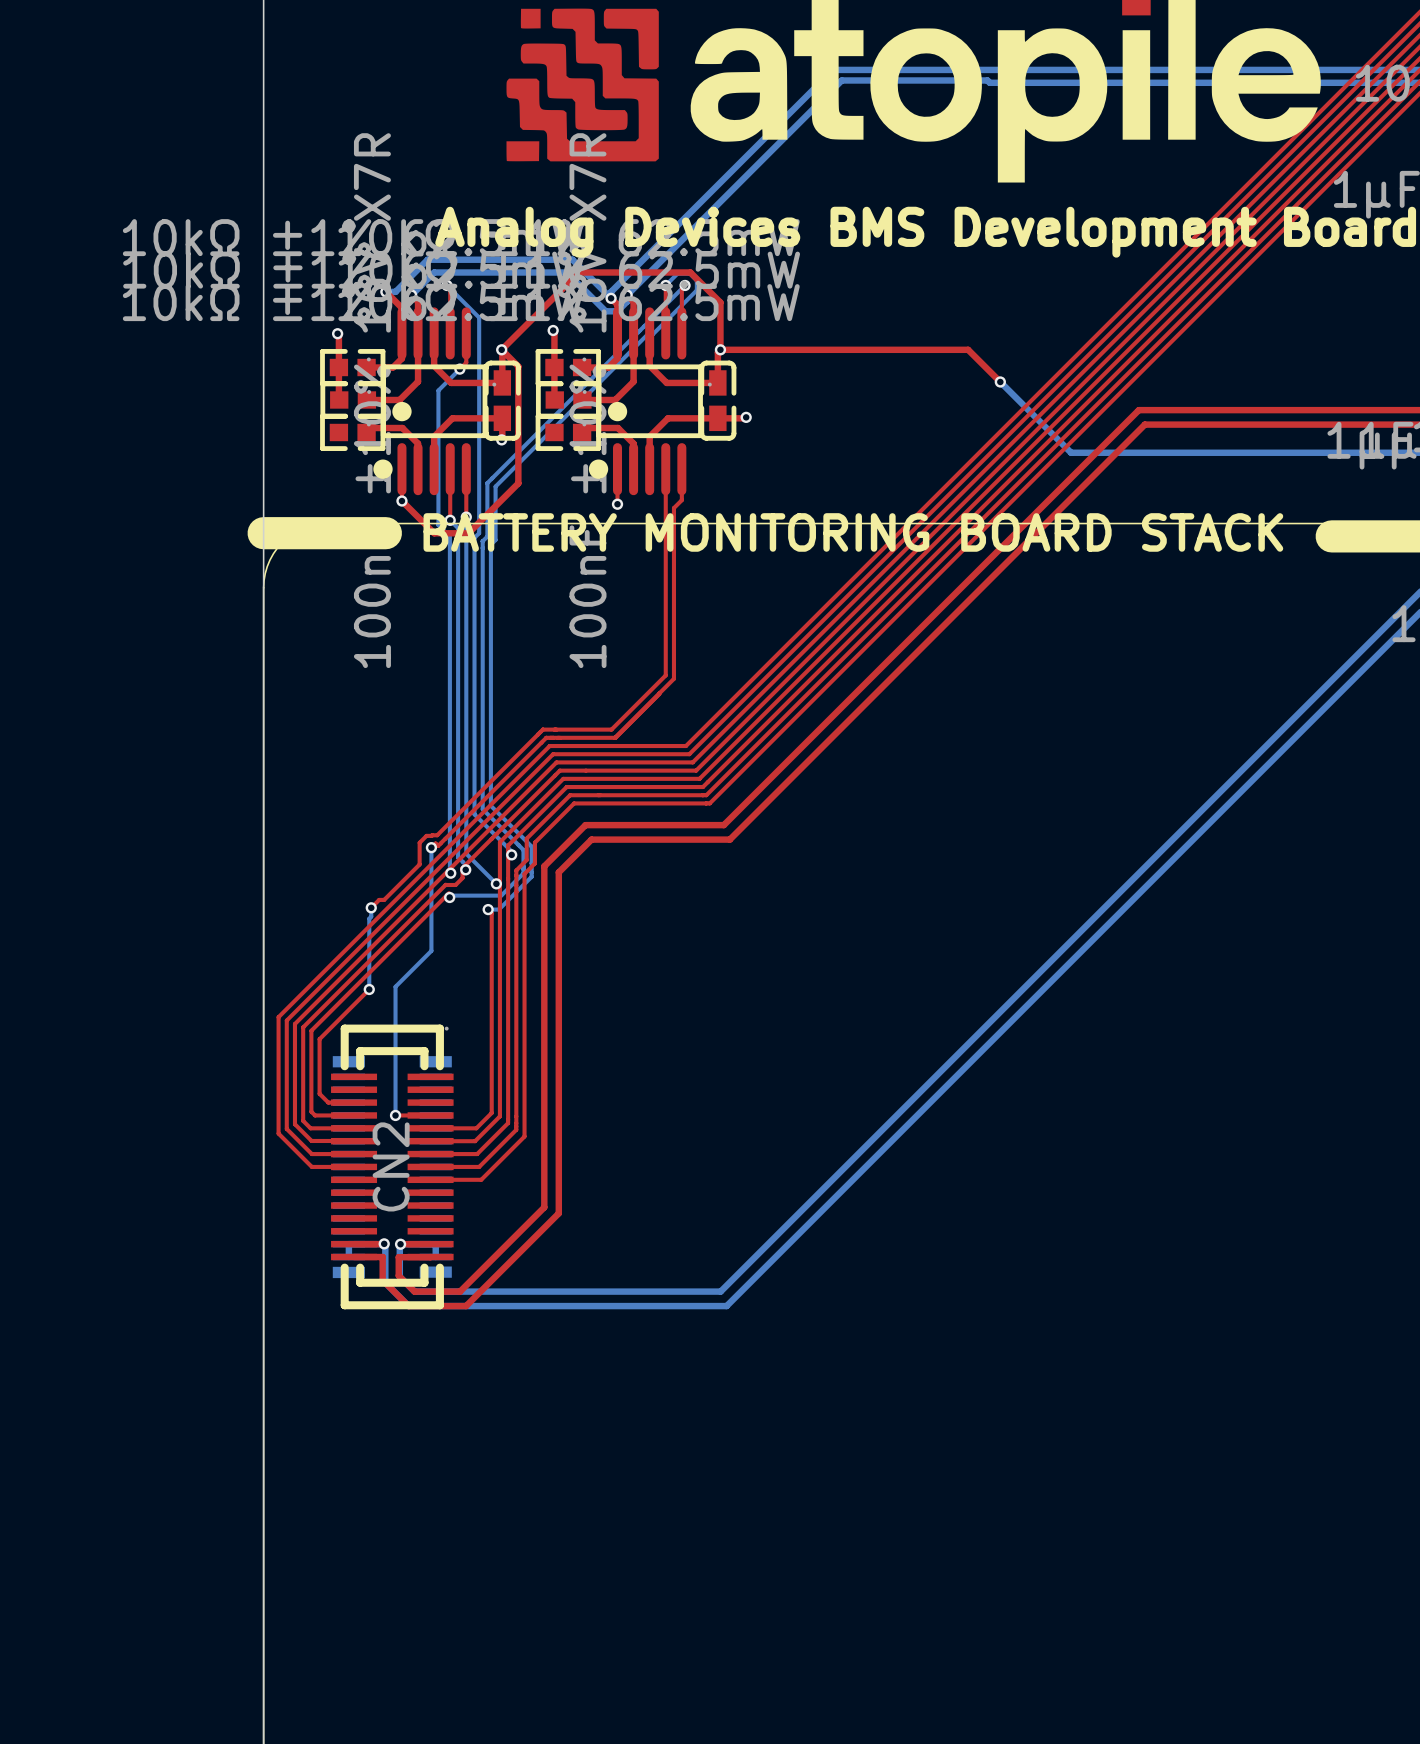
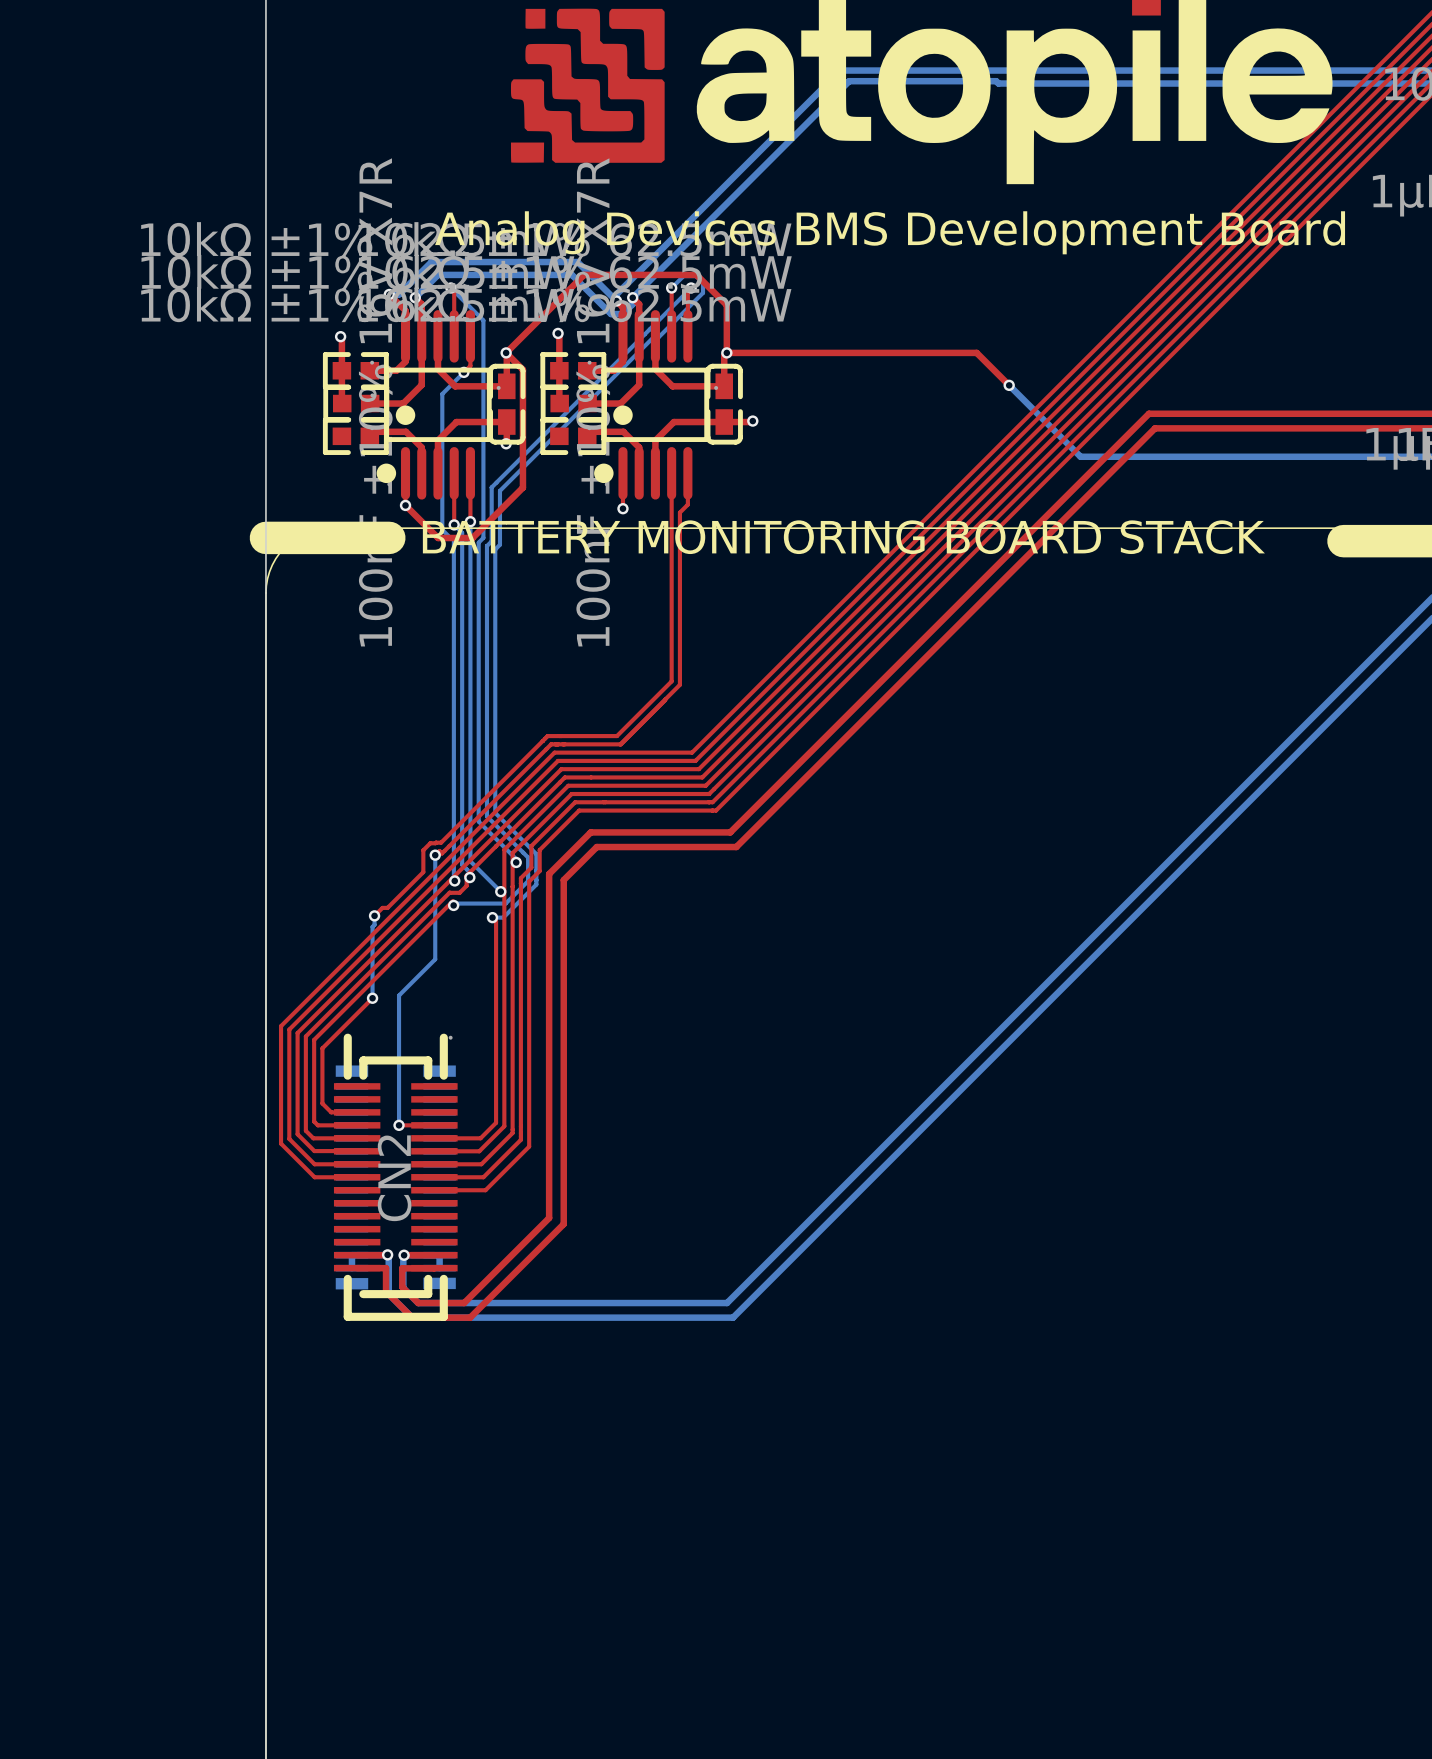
part footprint: [331, 1024, 454, 1310] -> [333, 1033, 458, 1321]

